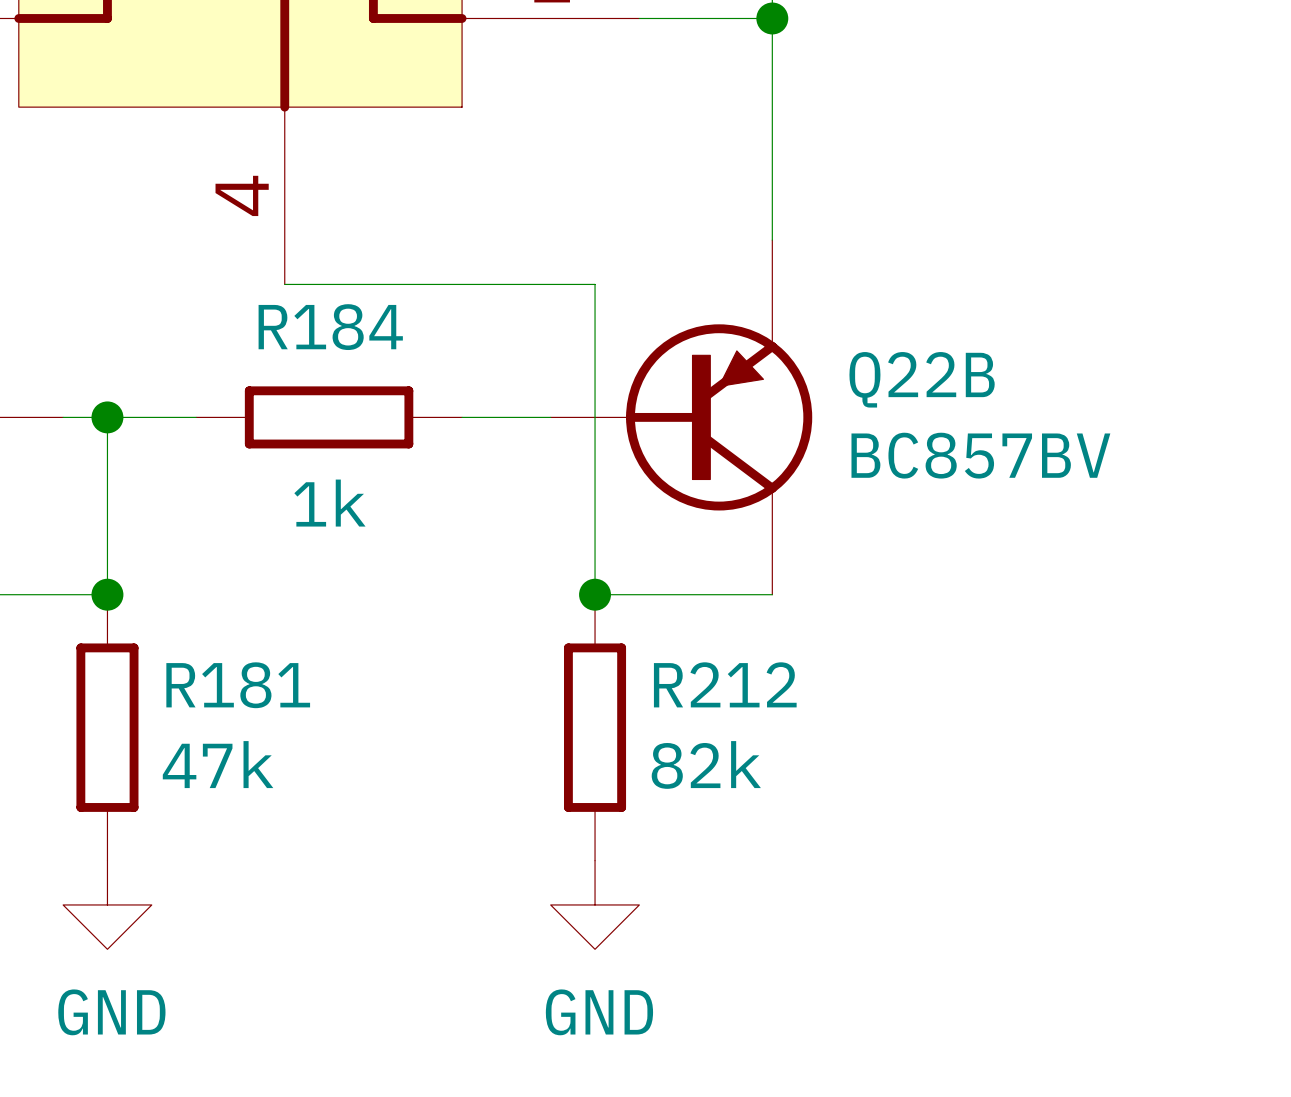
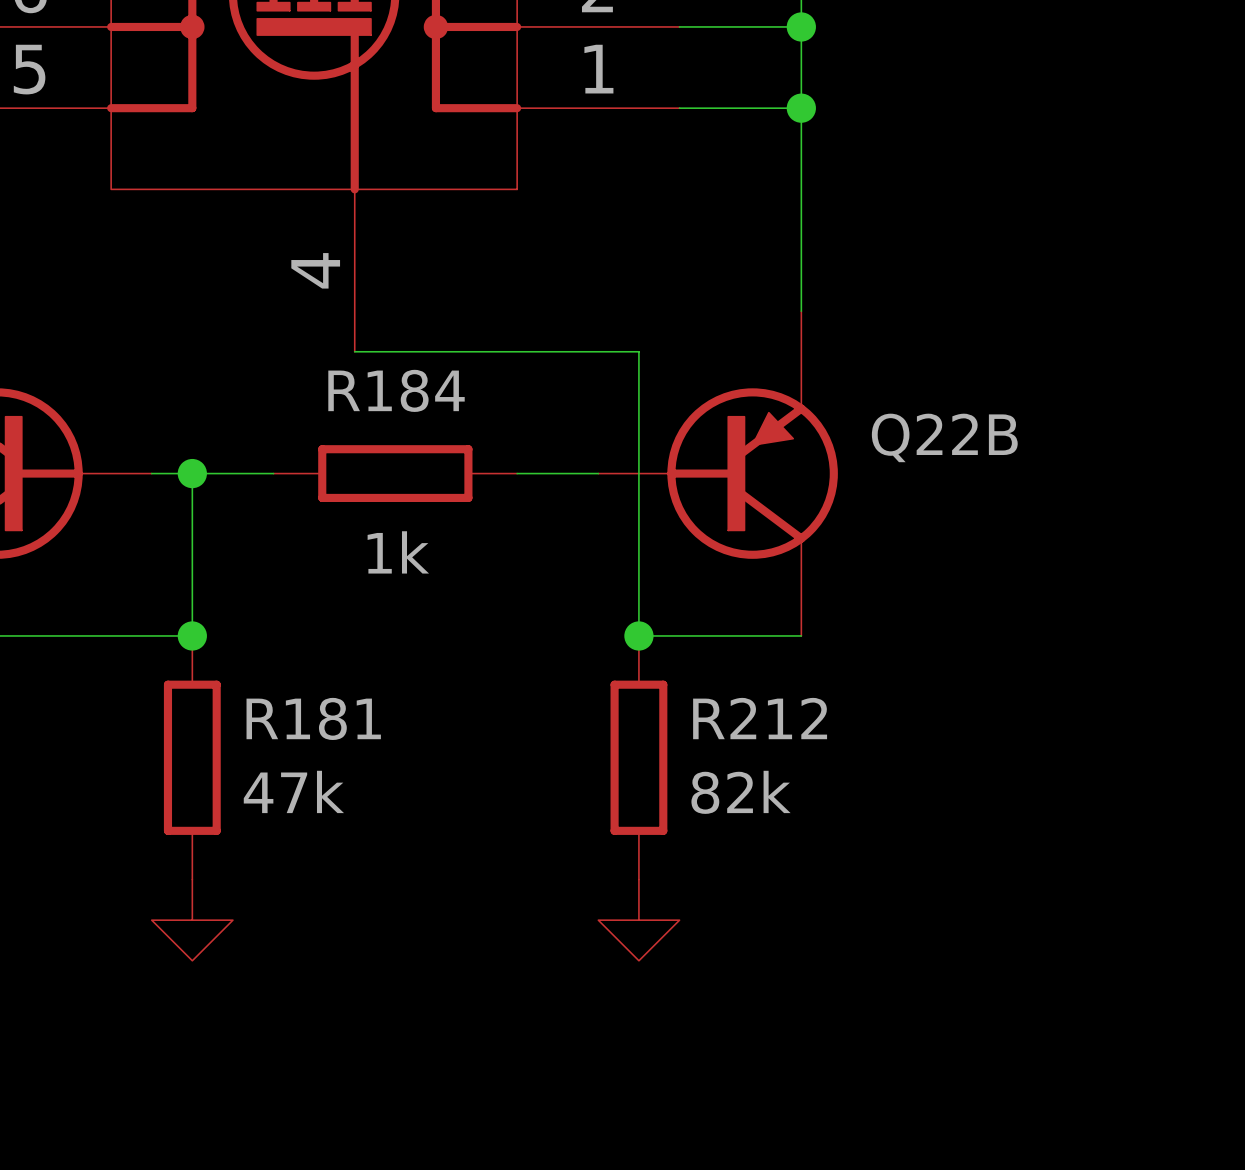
Q22B value: BC857BV (980, 455) -> none
power symbol text: GND (111, 1012) -> none
power symbol text: GND (599, 1012) -> none

